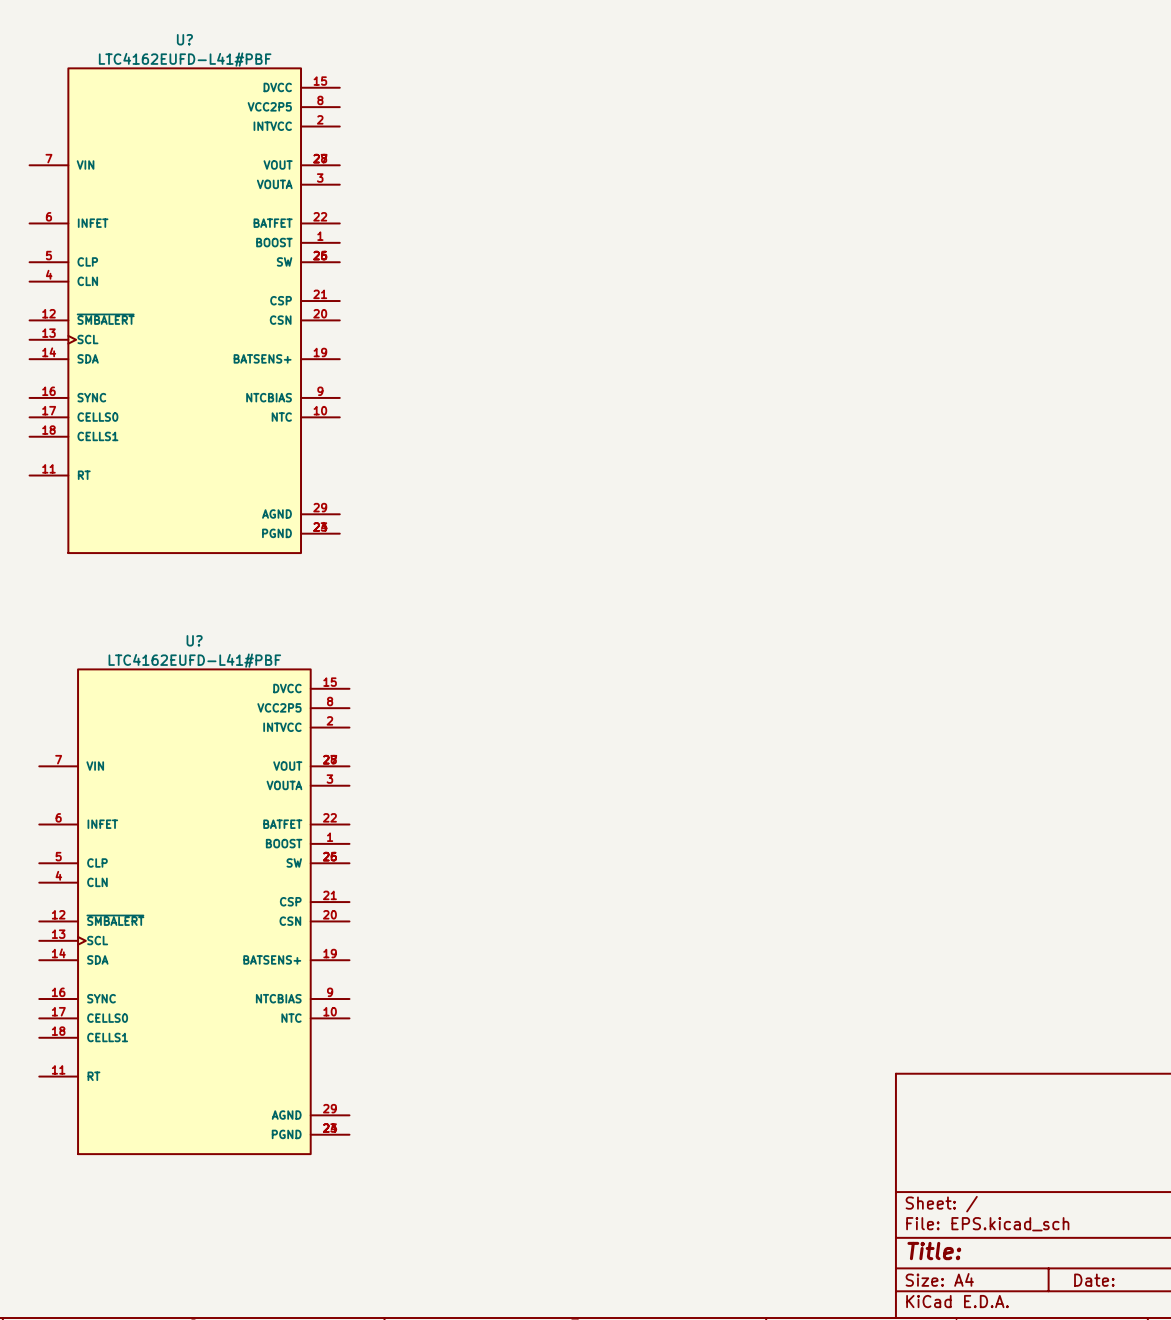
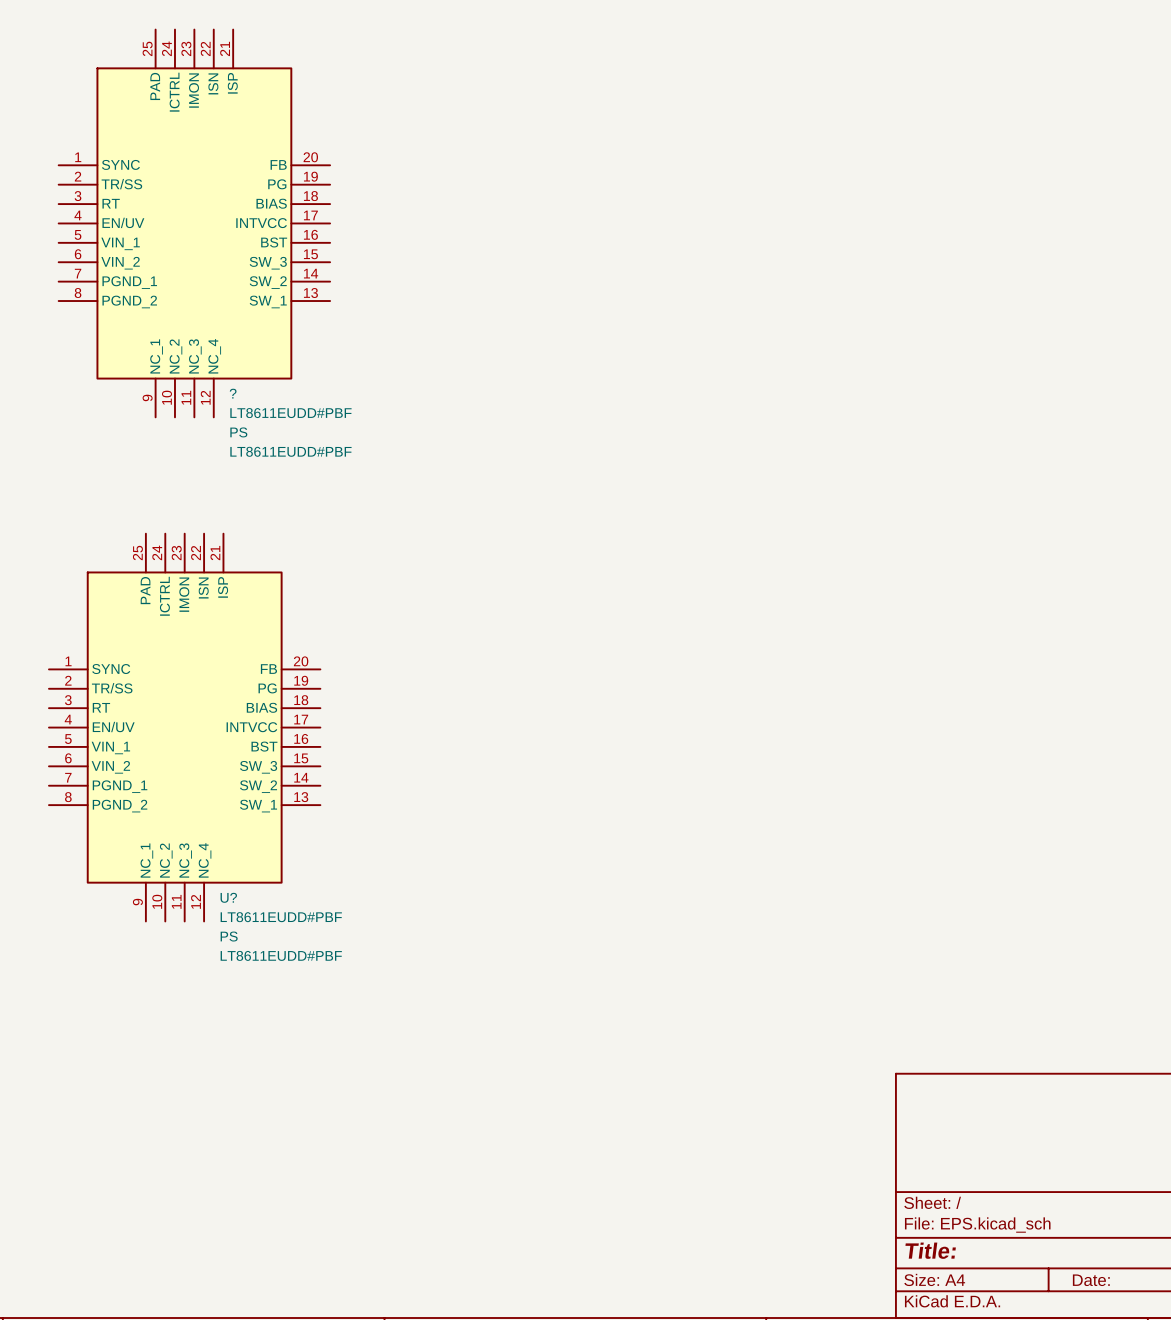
part: none -> LT8611EUDD#PBF (194, 223)
U?: LTC4162EUFD-L41#PBF (184, 310) -> none
U?: none -> LT8611EUDD#PBF (184, 727)
U?: LTC4162EUFD-L41#PBF (194, 911) -> none

